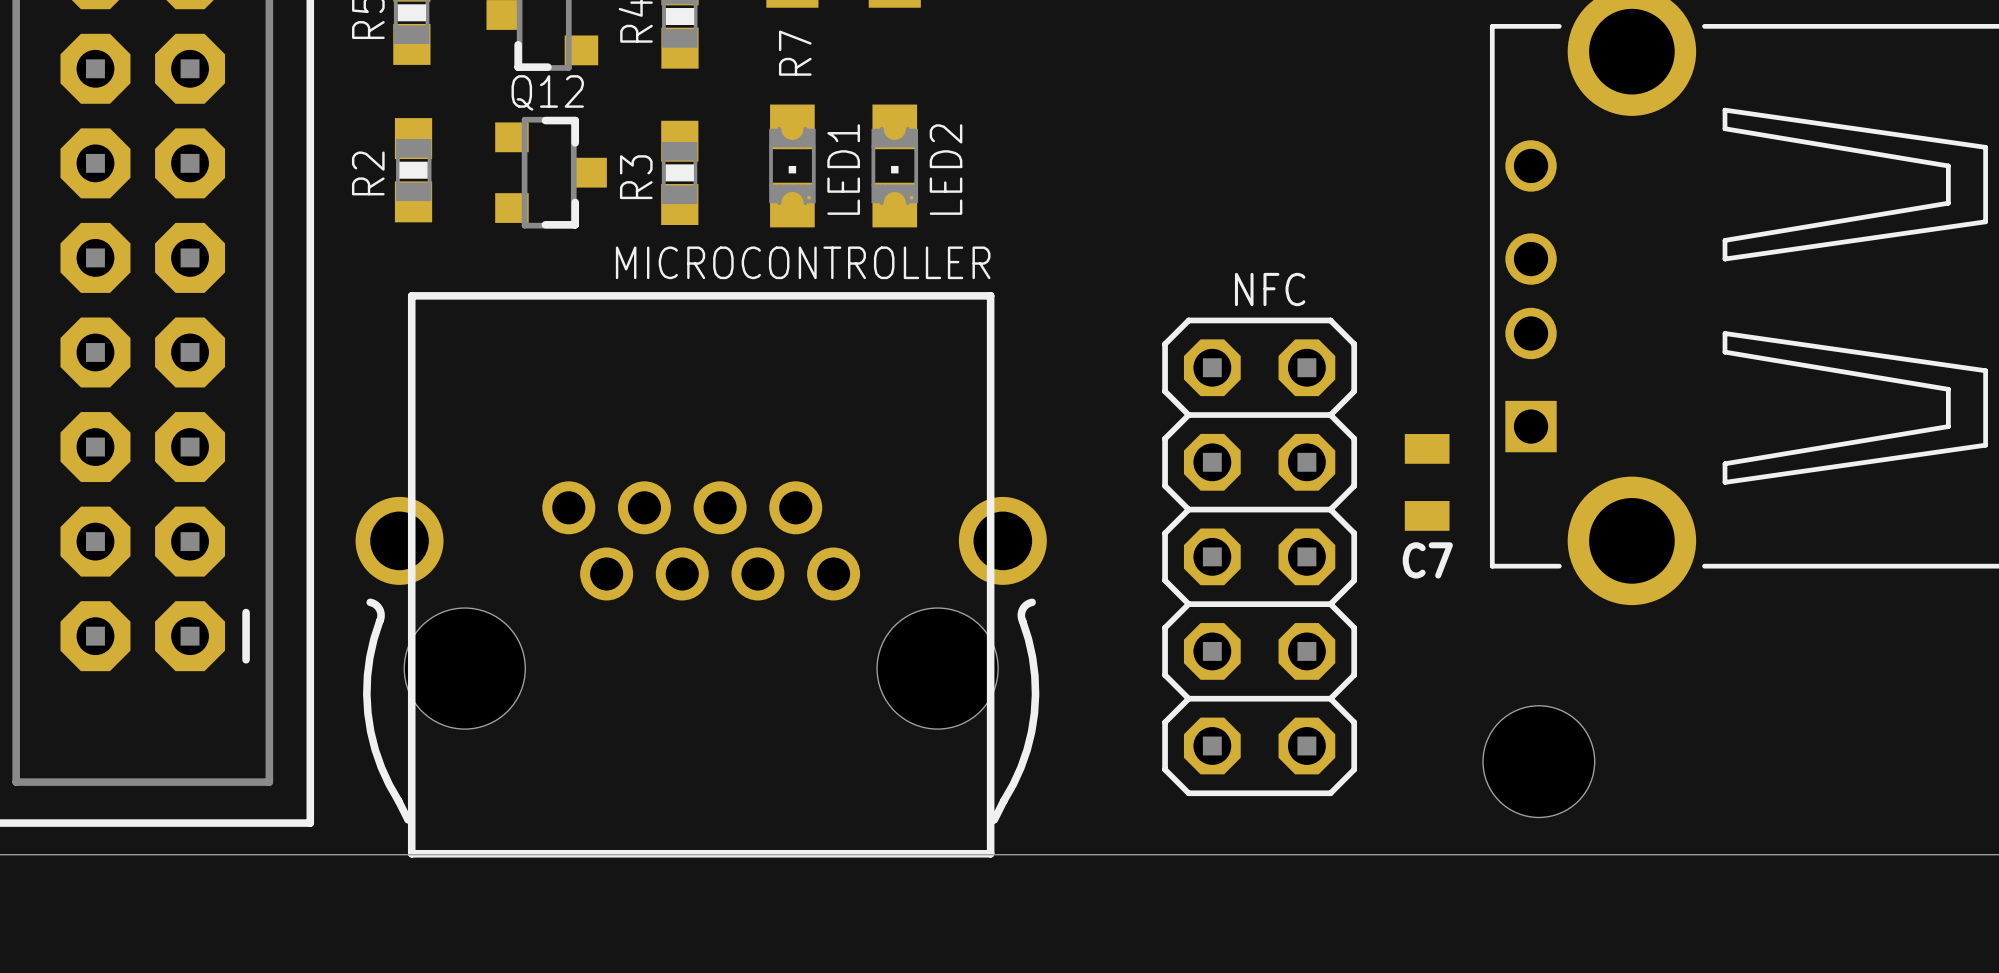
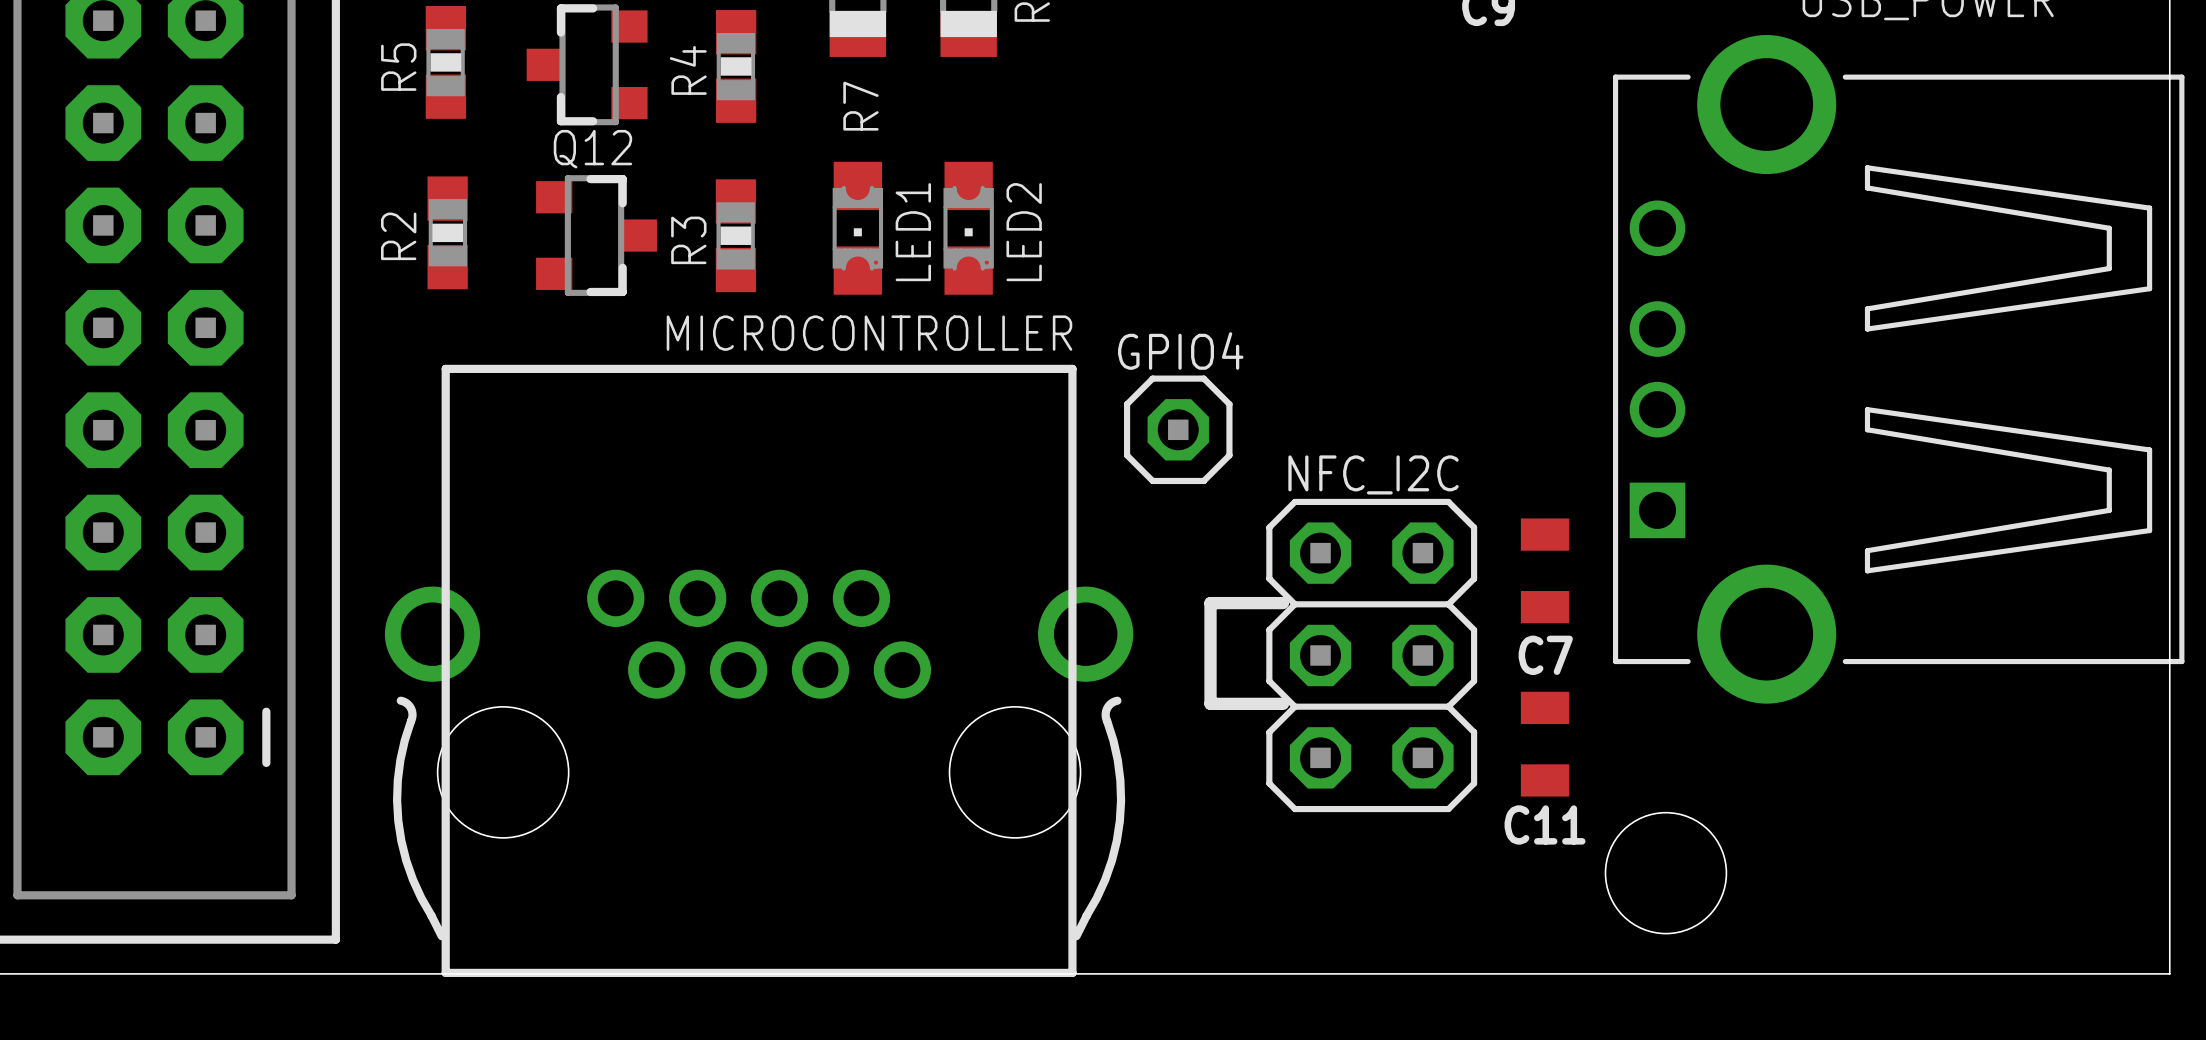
GPIO4: none -> (1178, 429)
line: none -> (1283, 603) (1210, 603) (1210, 703) (1283, 703)
NFC: (1259, 556) -> none
NFC_I2C: none -> (1371, 655)
C11: none -> (1545, 744)

